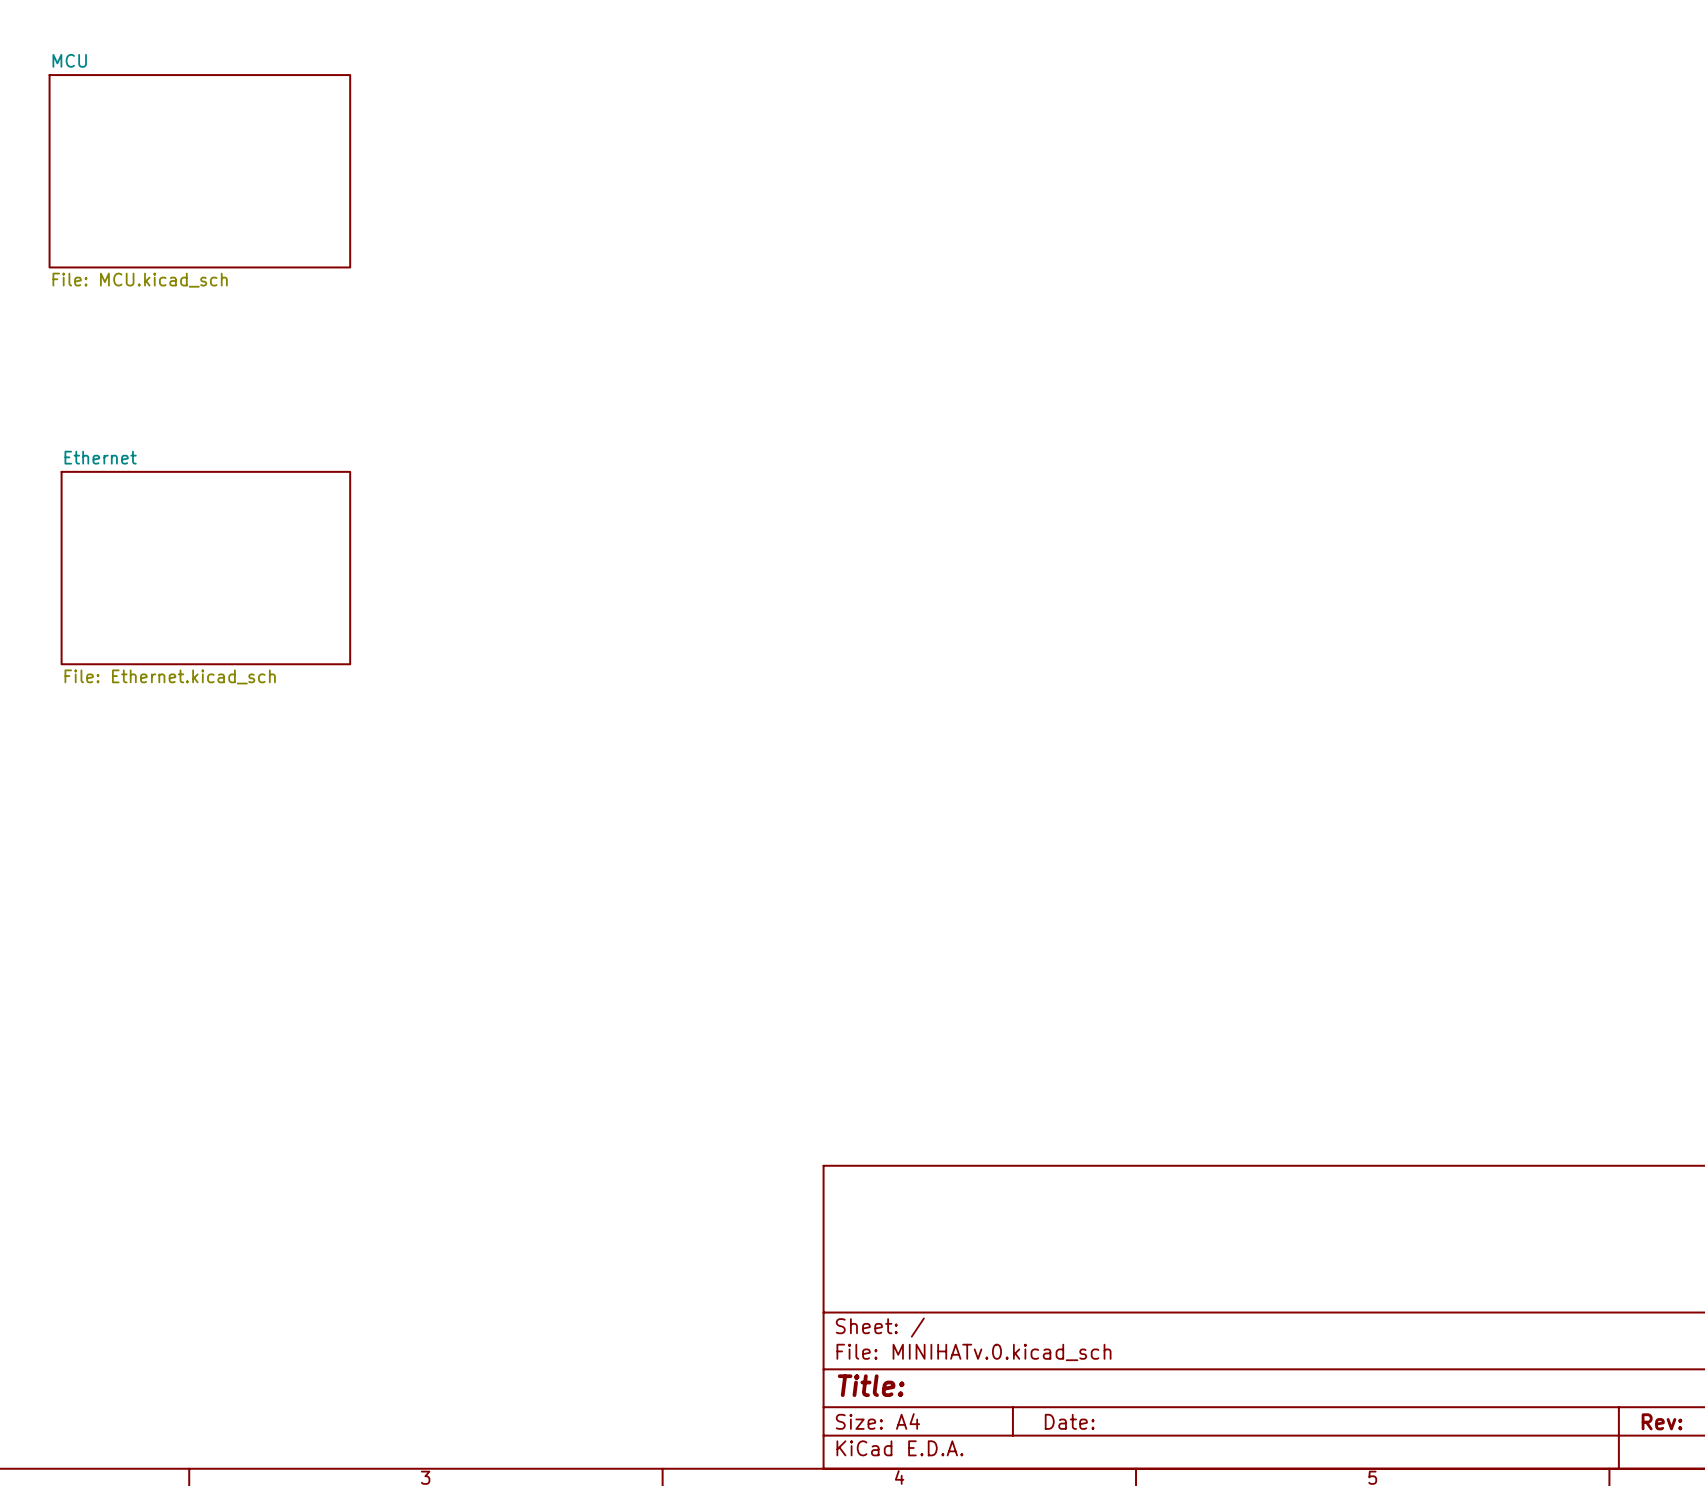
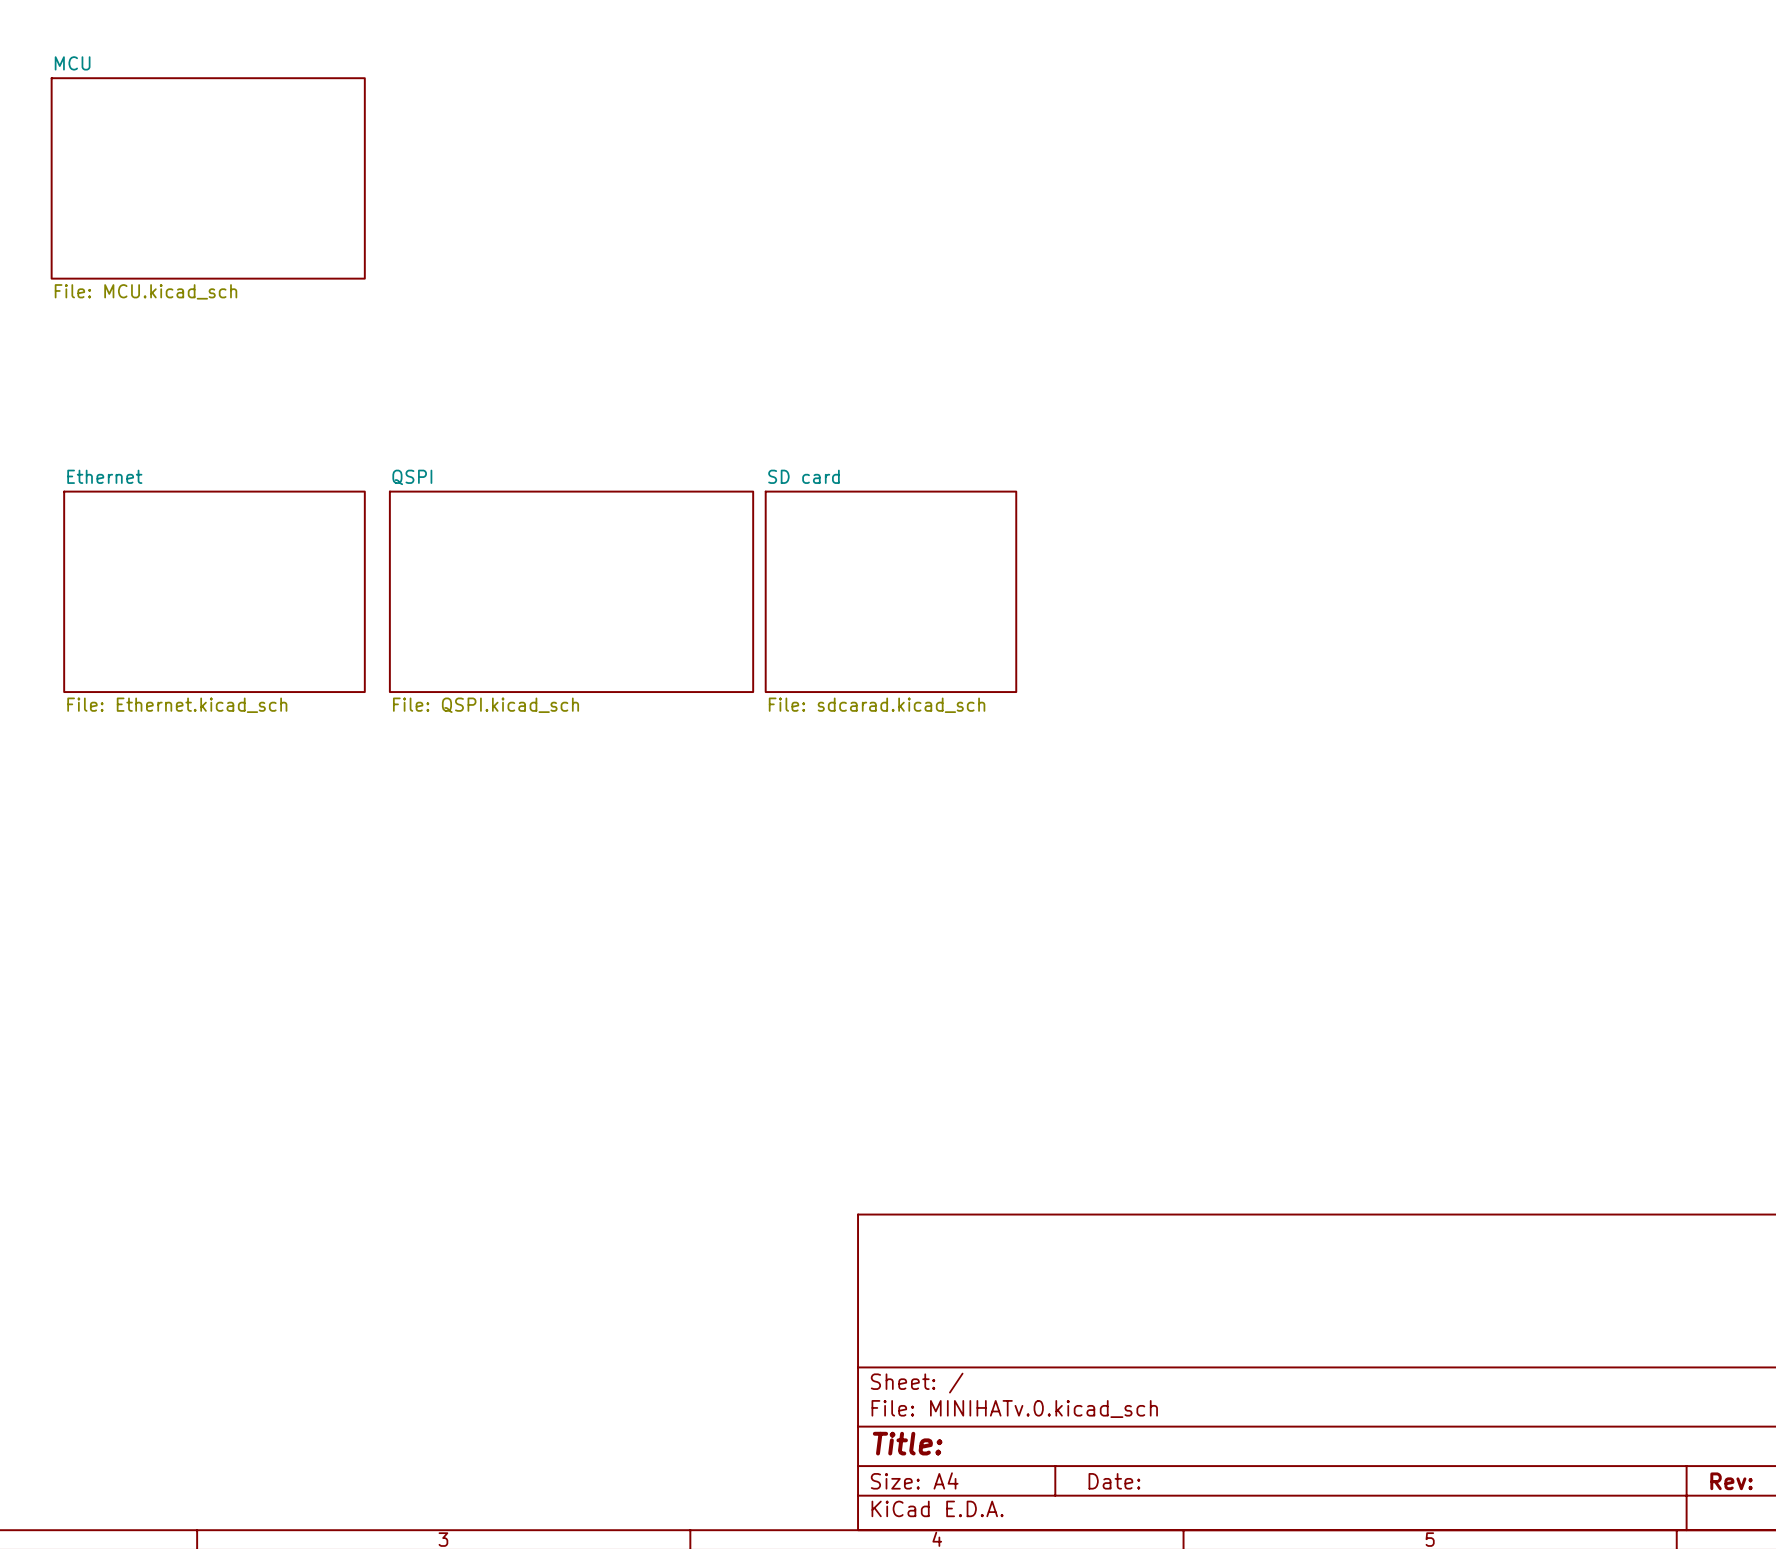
sheet QSPI: none -> File: QSPI.kicad_sch (571, 591)
sheet SD card: none -> File: sdcarad.kicad_sch (890, 591)

